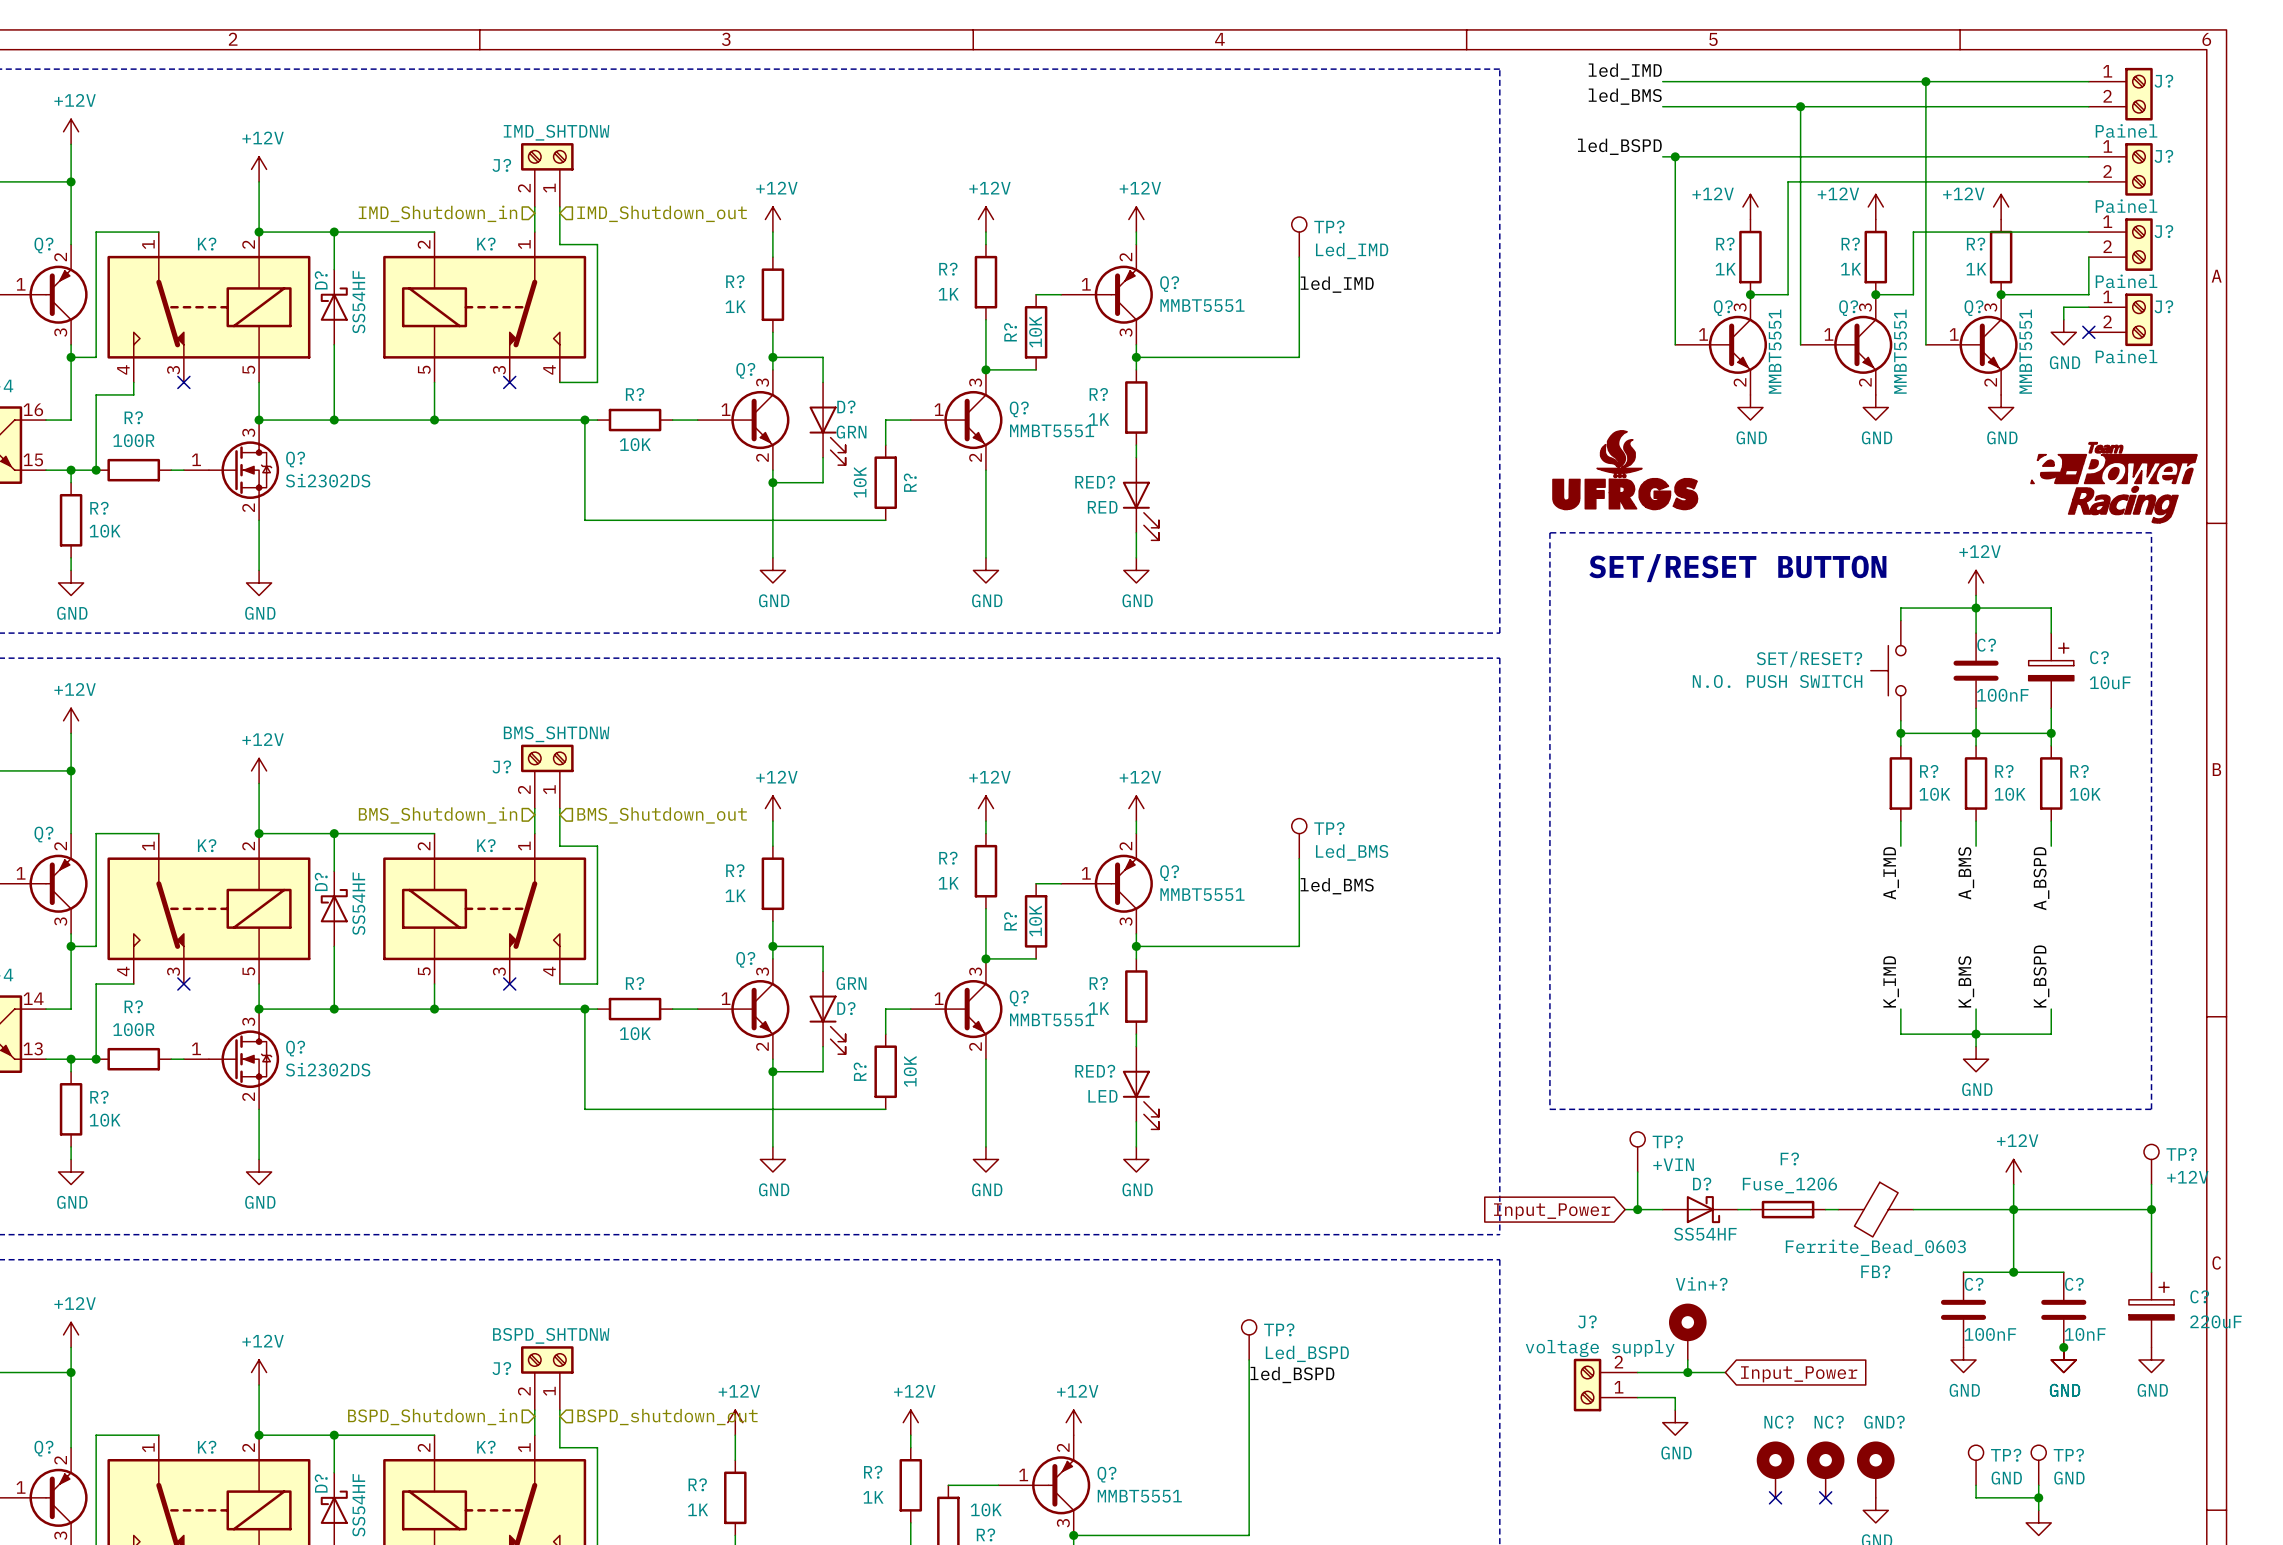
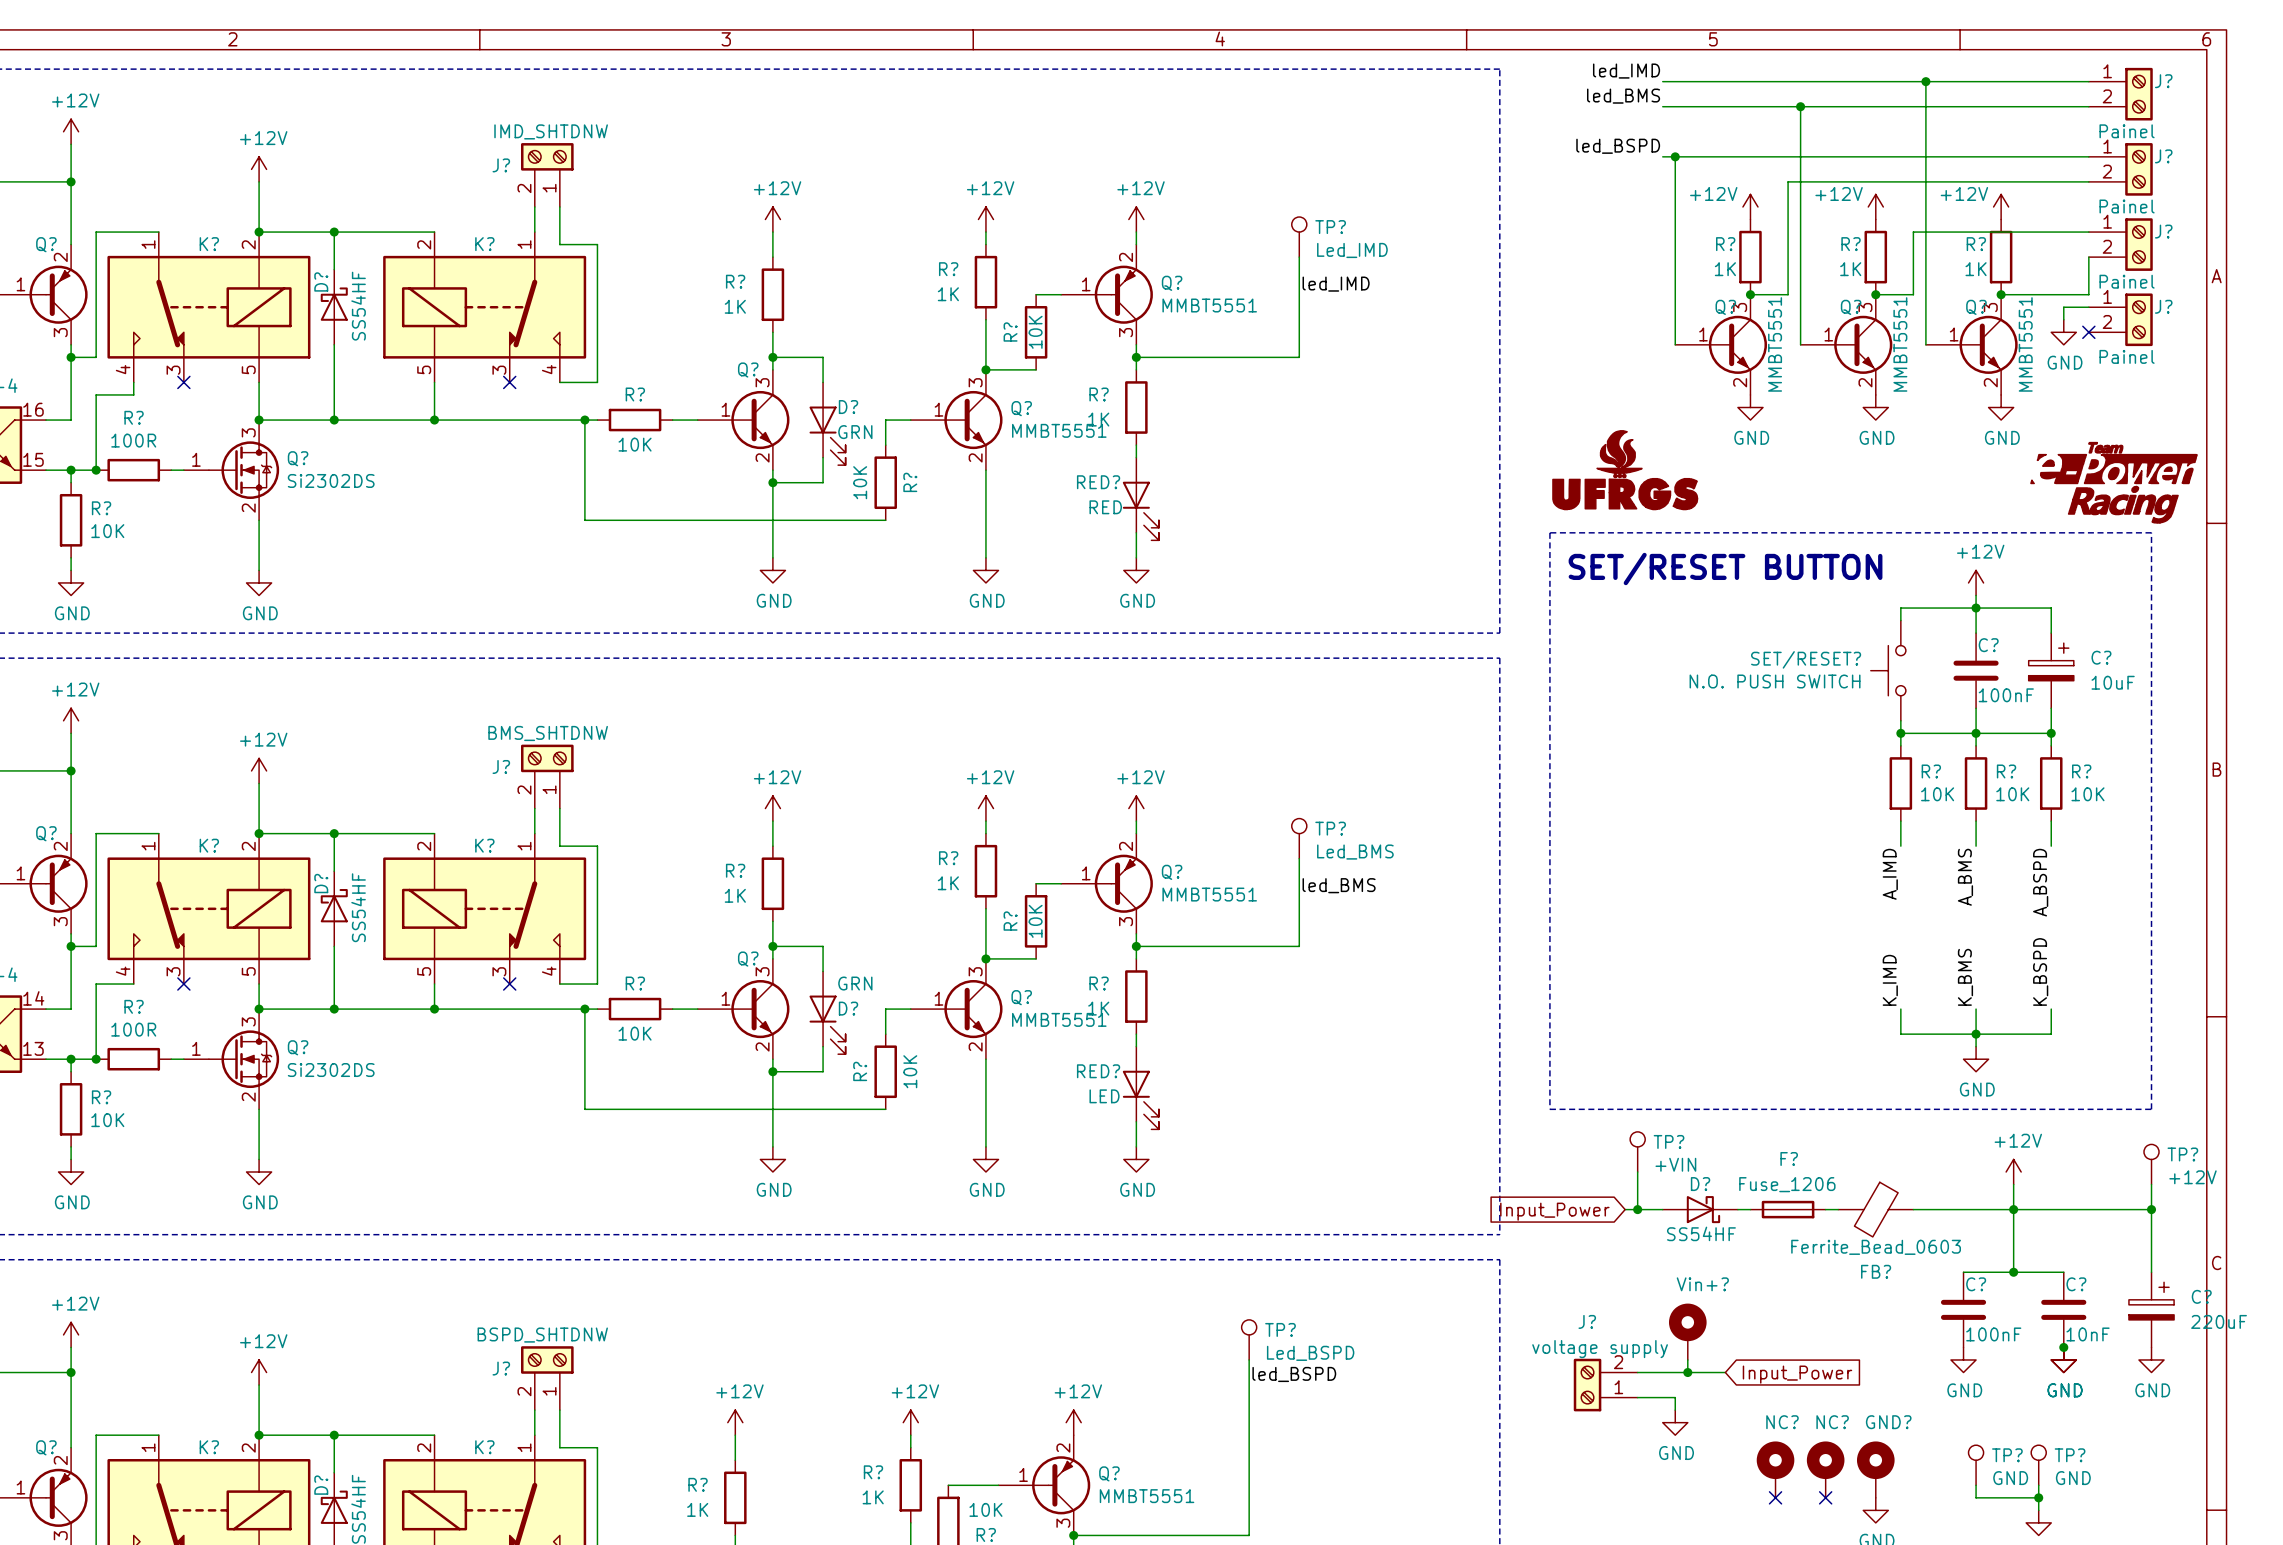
hierarchical label: IMD_Shutdown_in (438, 213) -> none
hierarchical label: IMD_Shutdown_out (662, 213) -> none
hierarchical label: BMS_Shutdown_in (438, 815) -> none
hierarchical label: BMS_Shutdown_out (662, 815) -> none
hierarchical label: BSPD_Shutdown_in (432, 1416) -> none
hierarchical label: BSPD_shutdown_out (667, 1417) -> none

